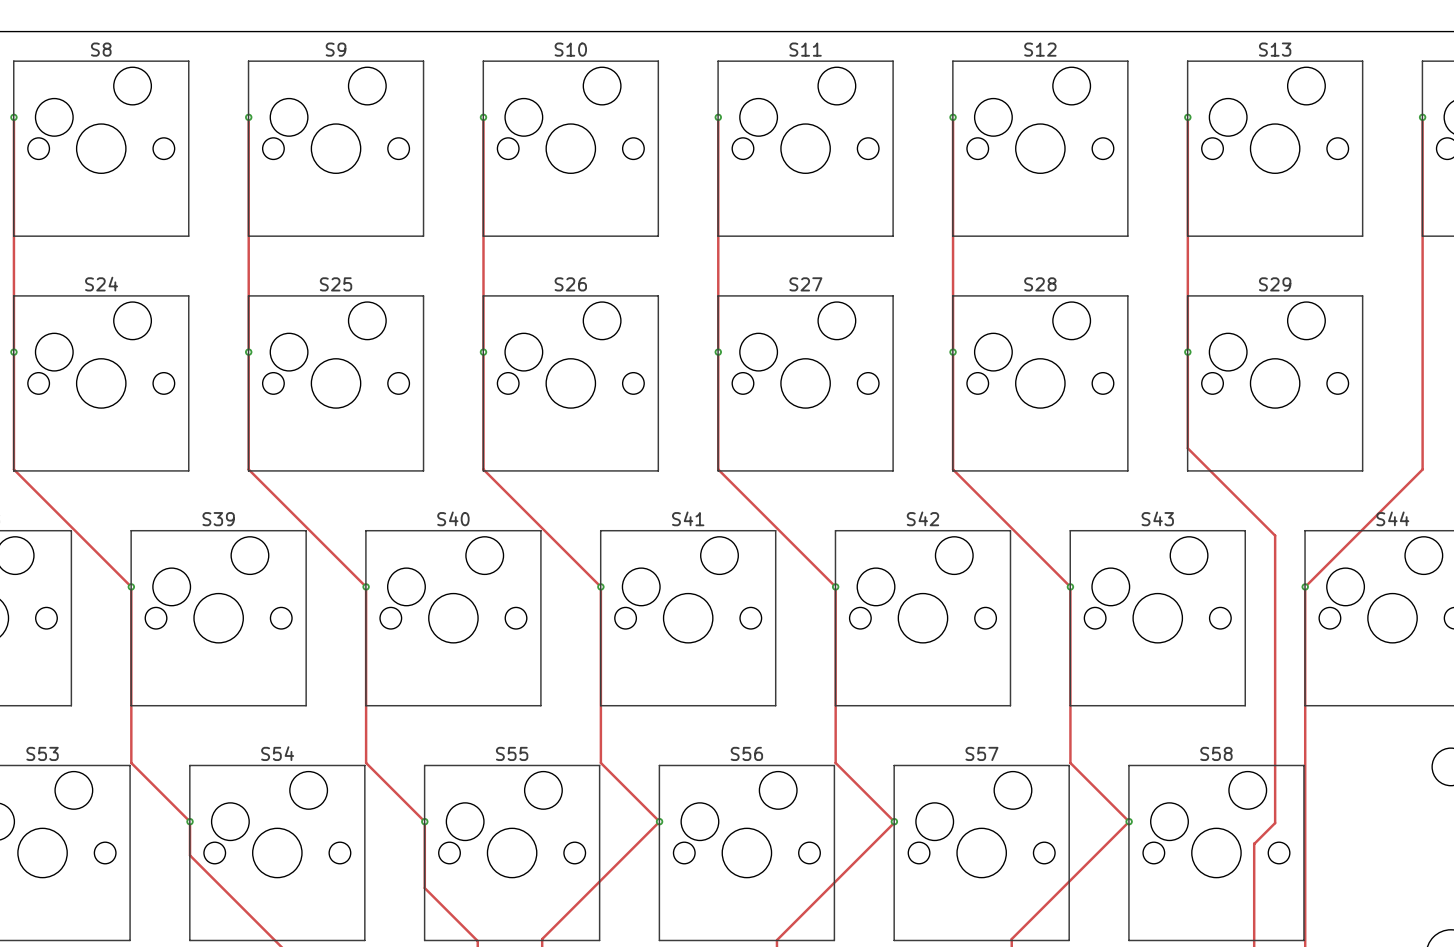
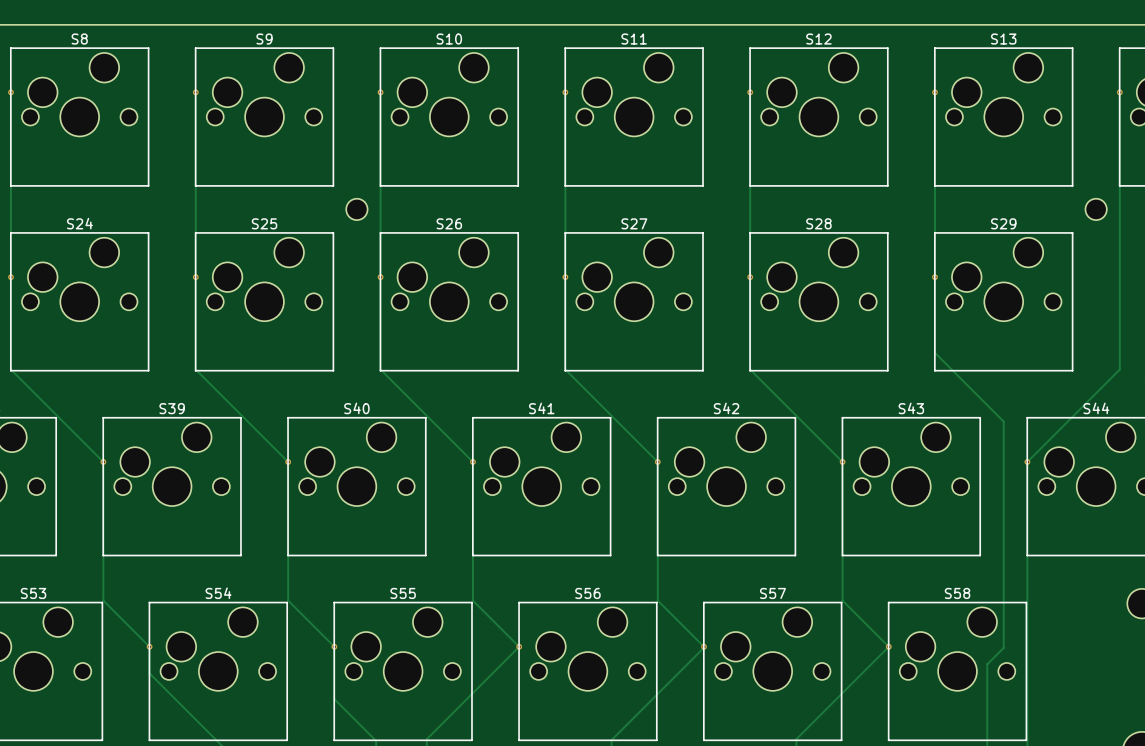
part: none -> (356, 209)
part: none -> (1096, 209)

